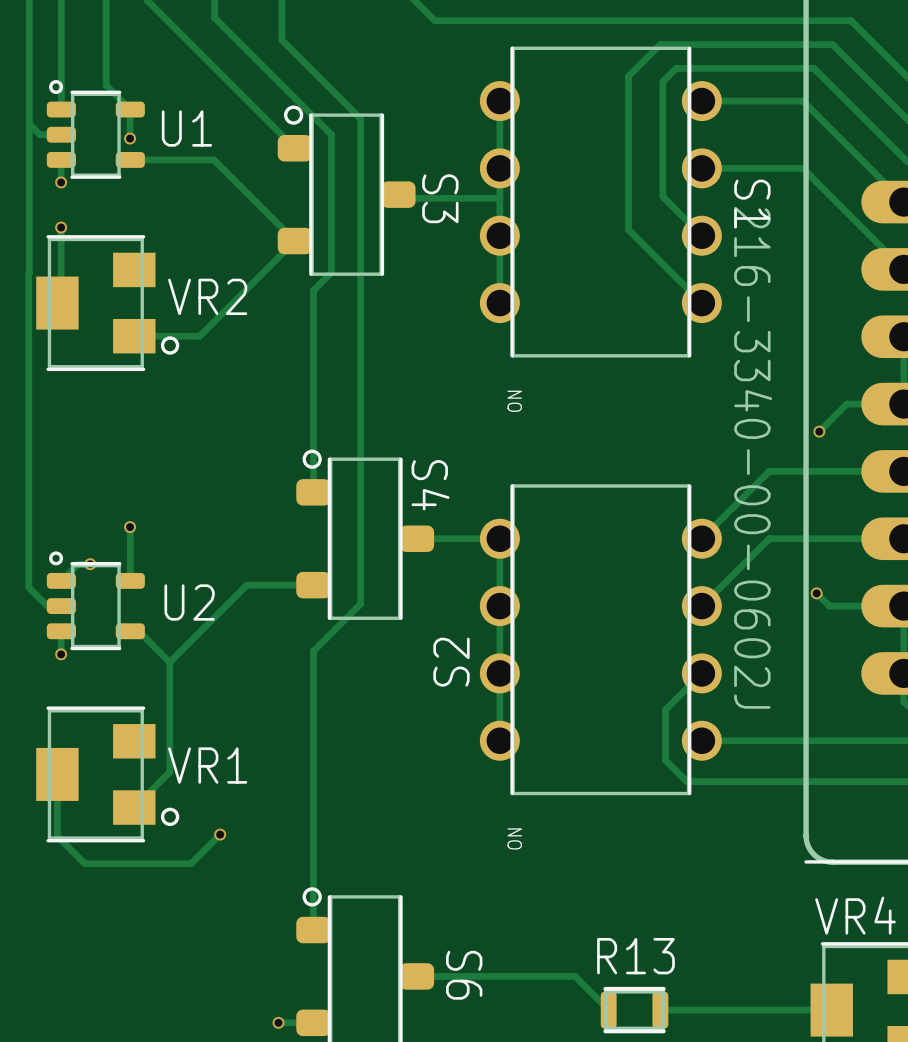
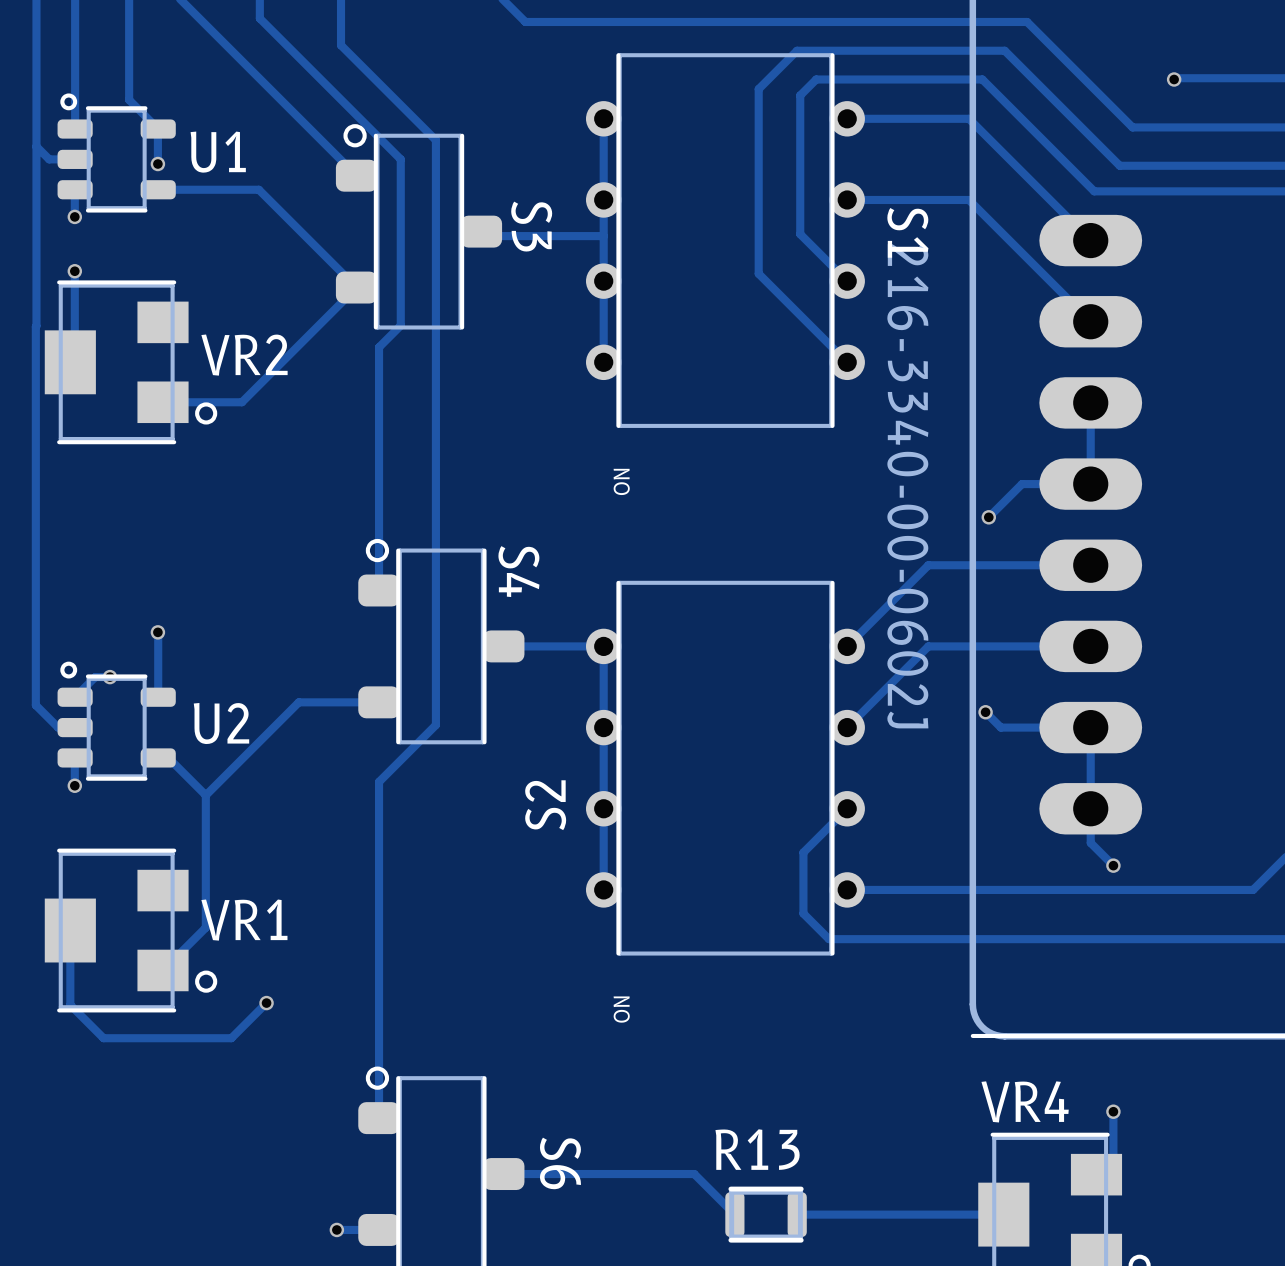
S1 footprint: [479, 46, 722, 358] -> [586, 53, 865, 428]
S2 footprint: [479, 484, 722, 796] -> [586, 580, 865, 956]

